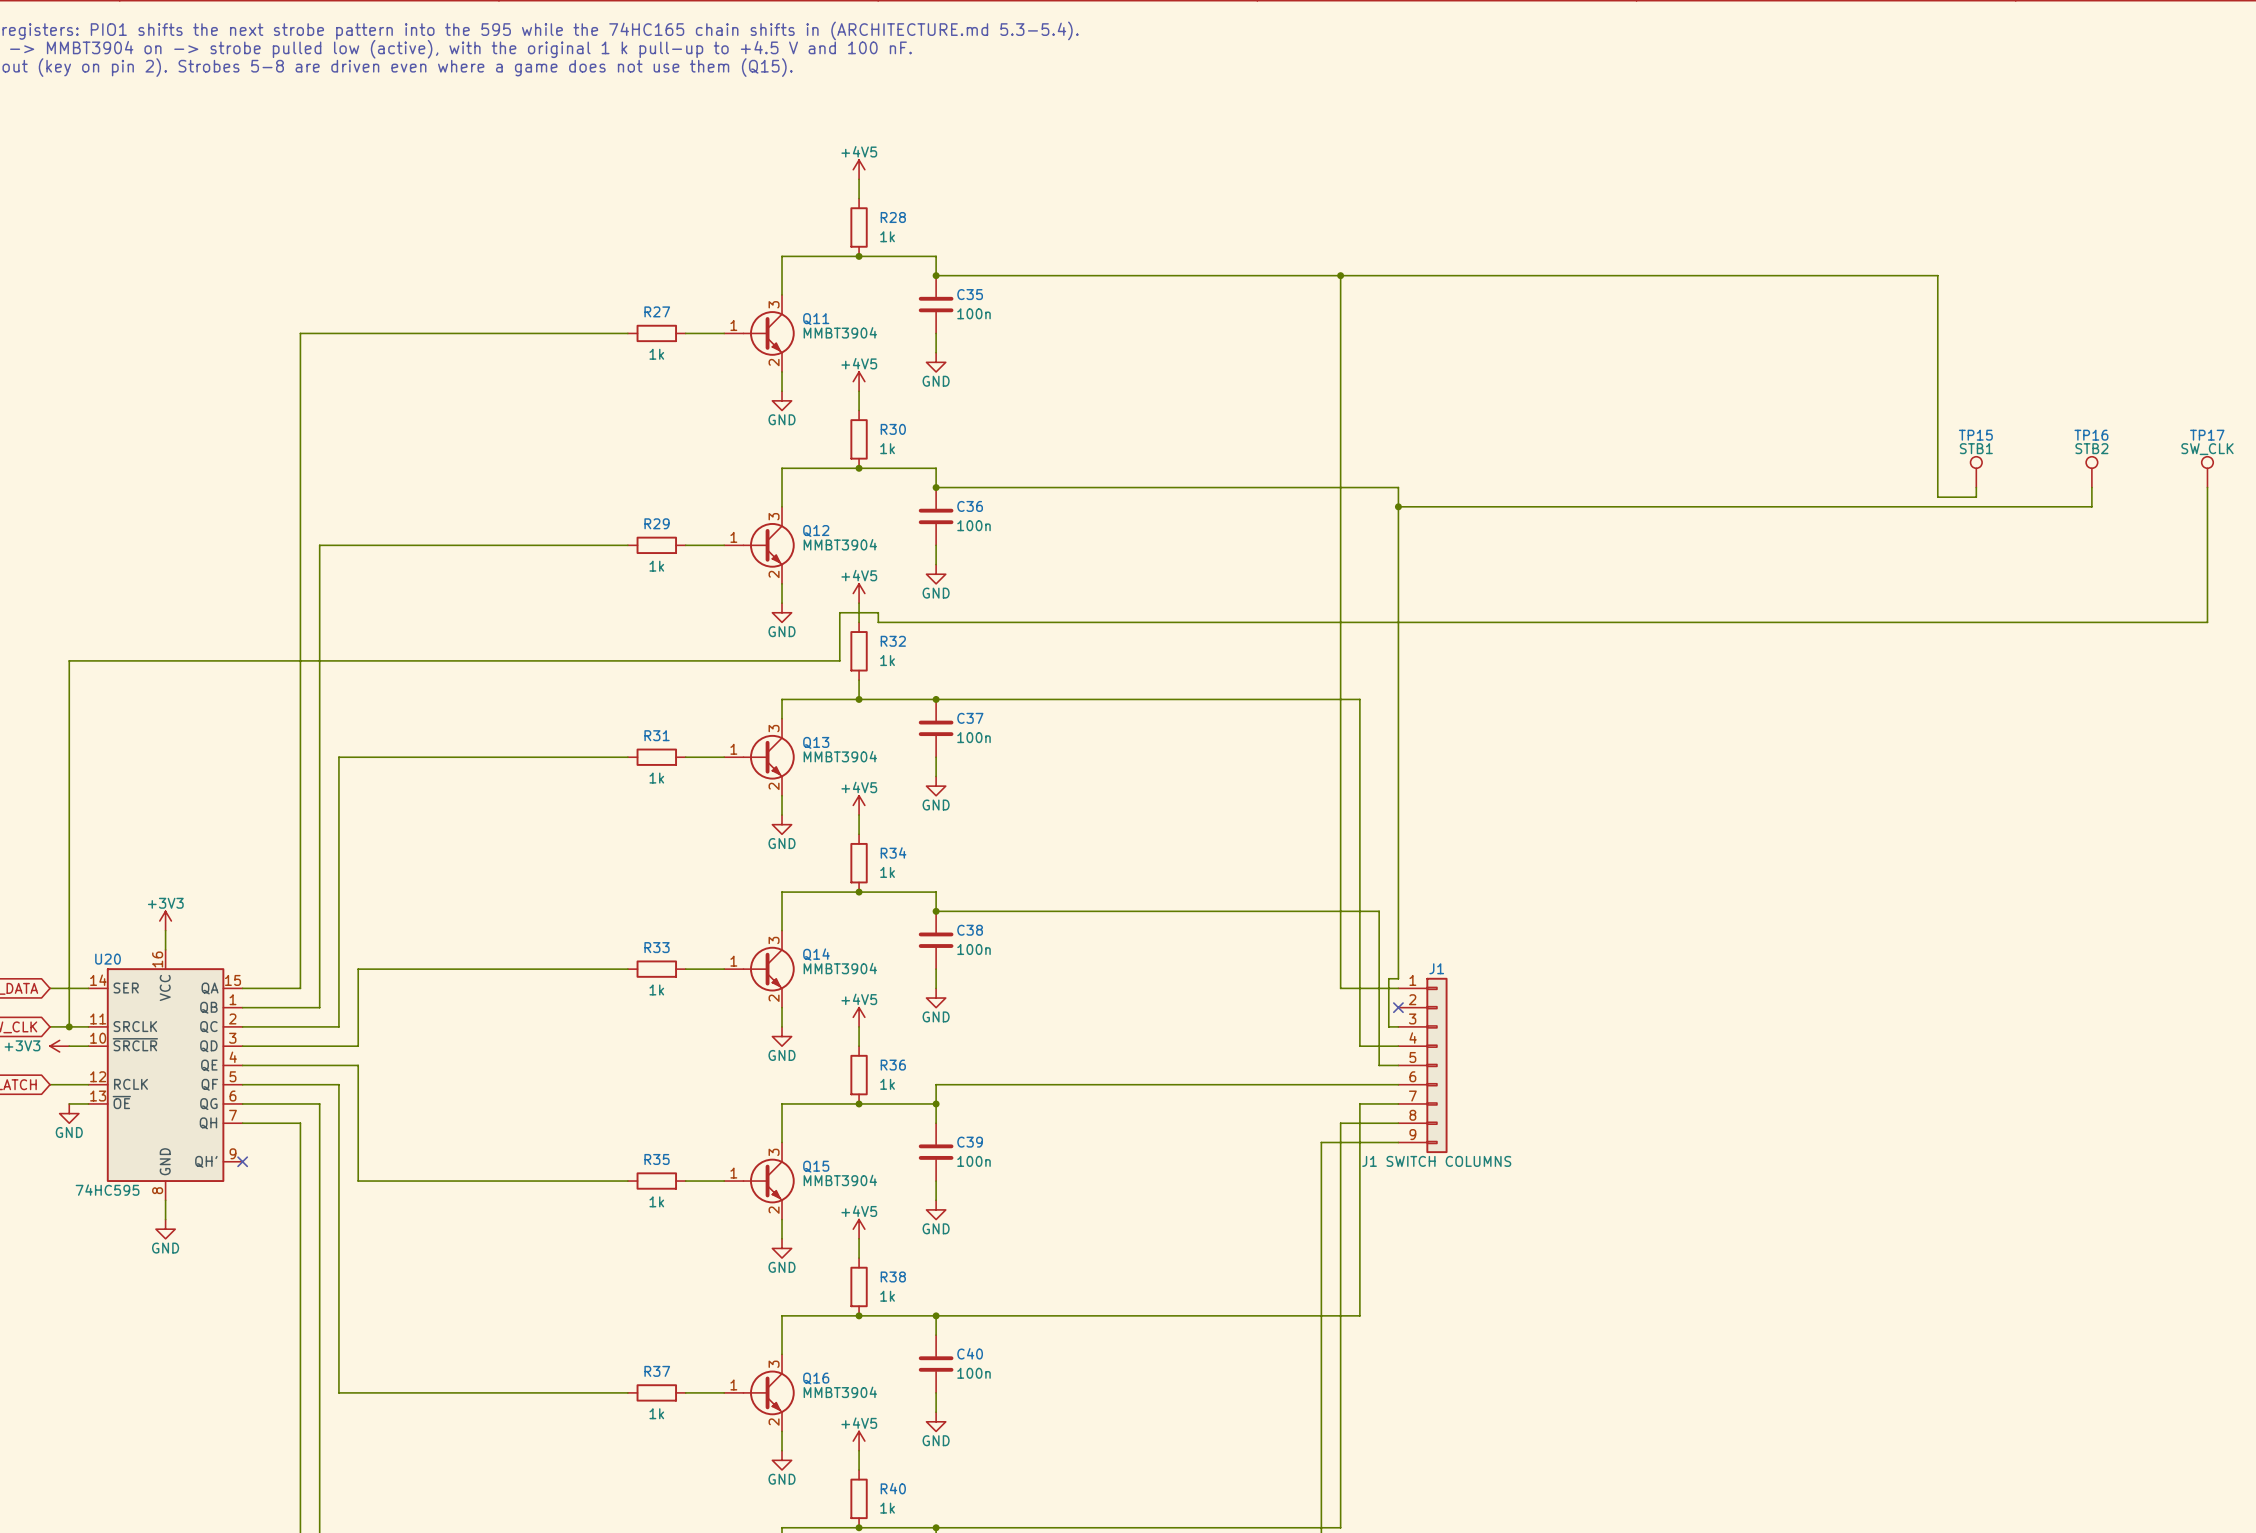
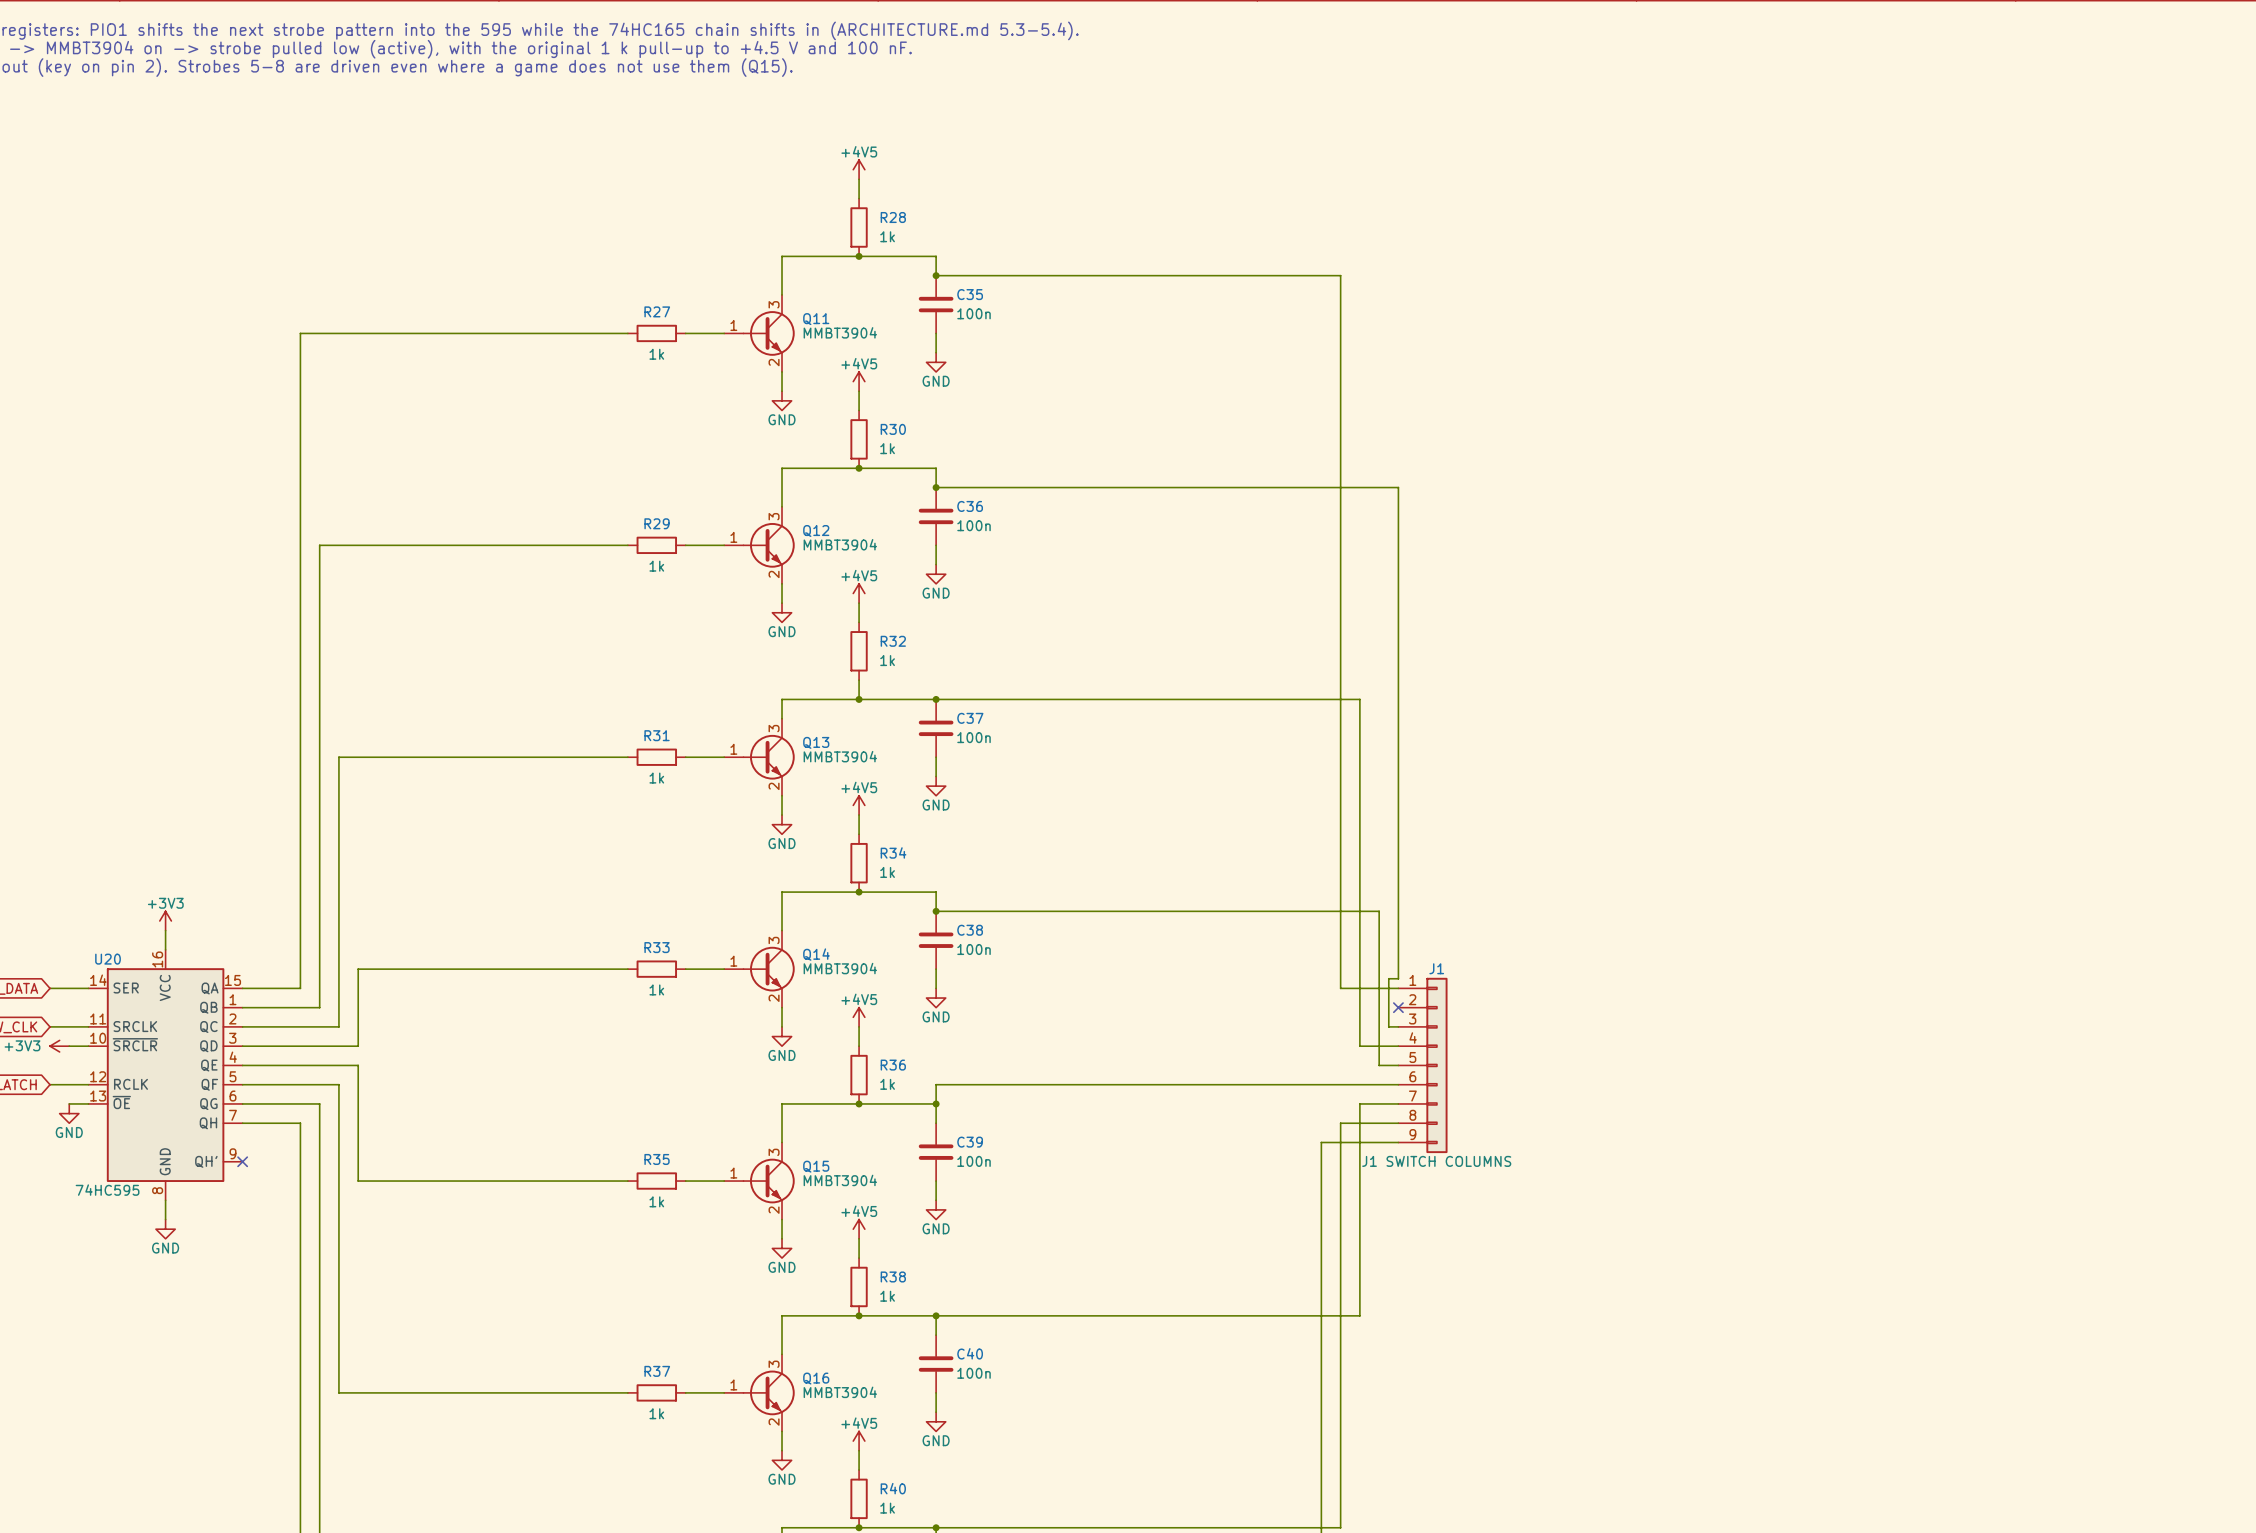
wire: (1340, 275) (1937, 275) (1937, 497) (1976, 497) (1976, 487) -> none
junction: (1340, 275) -> none
TP15: STB1 (1976, 472) -> none
TP16: STB2 (2091, 472) -> none
TP17: SW_CLK (2207, 472) -> none
wire: (2091, 487) (2091, 506) (1398, 506) -> none
wire: (2207, 487) (2207, 622) (878, 622) (878, 612) (839, 612) (839, 660) (69, 660) (69, 1026) -> none
junction: (1398, 506) -> none
junction: (69, 1026) -> none

